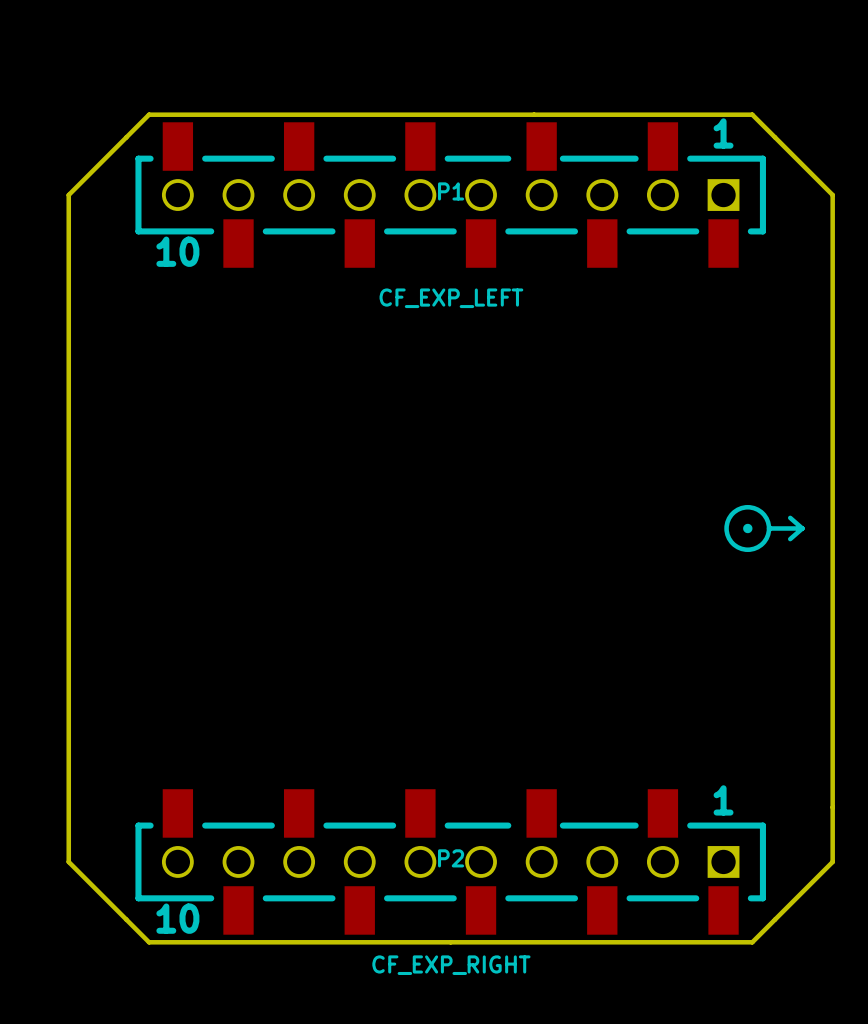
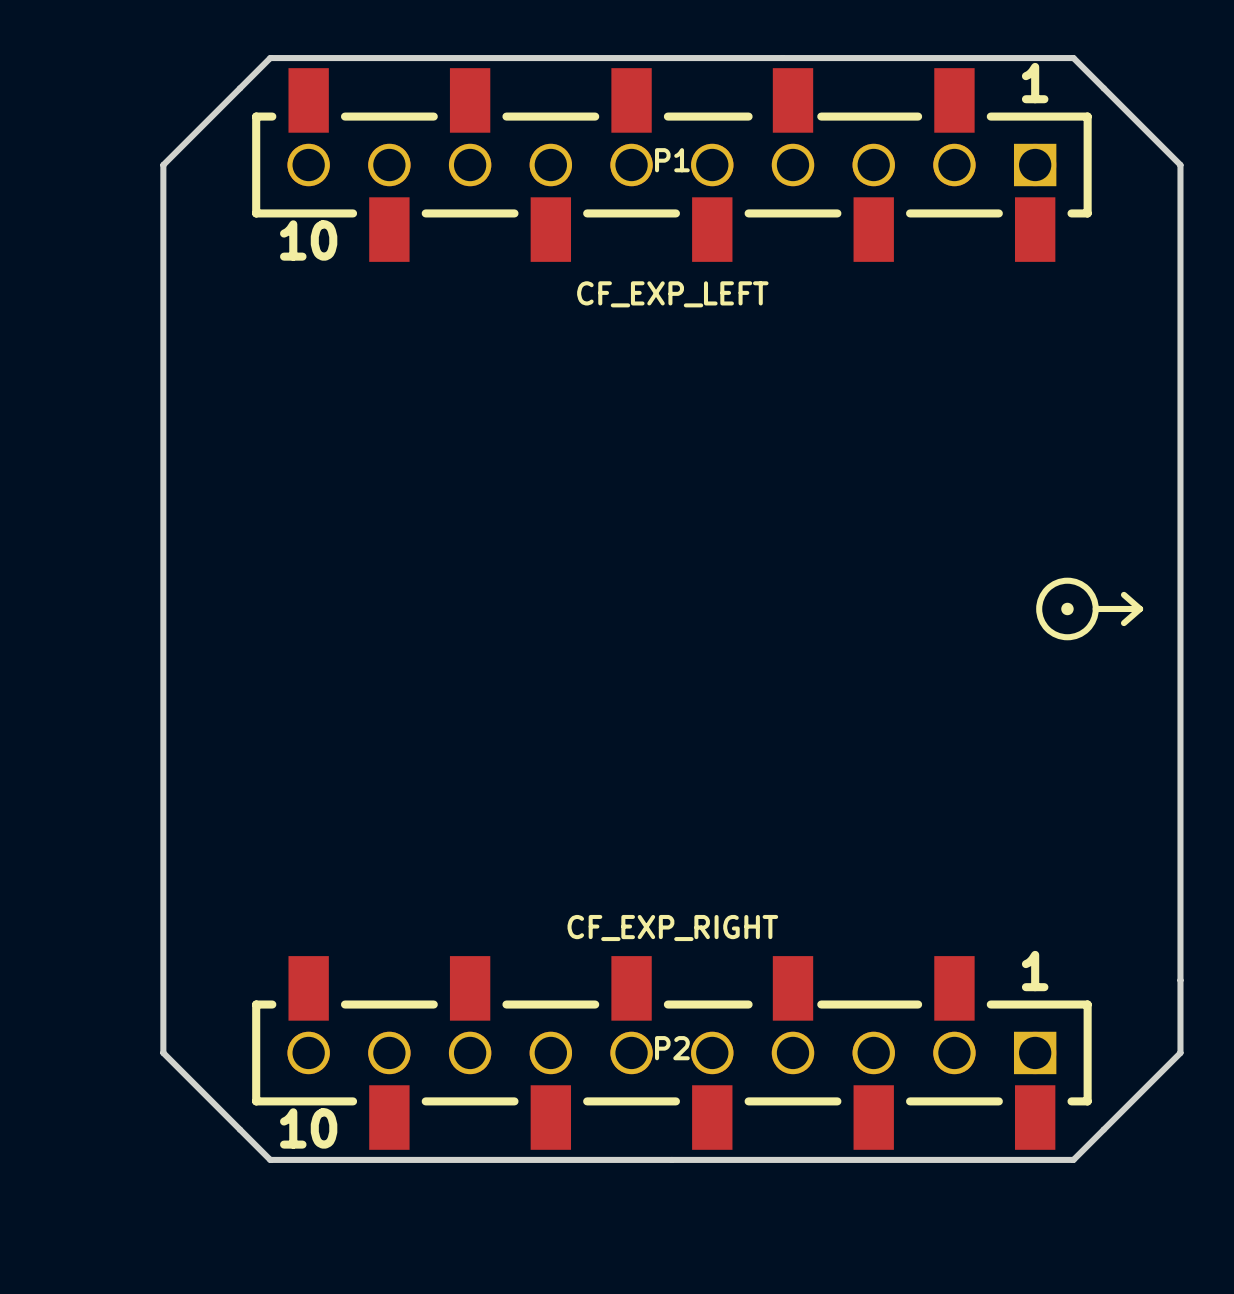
P1 footprint: [135, 122, 766, 268] -> [252, 68, 1092, 262]
P2 footprint: [135, 789, 766, 935] -> [252, 956, 1092, 1150]
P2 value position: CF_EXP_RIGHT (451, 965) -> CF_EXP_RIGHT (672, 928)

